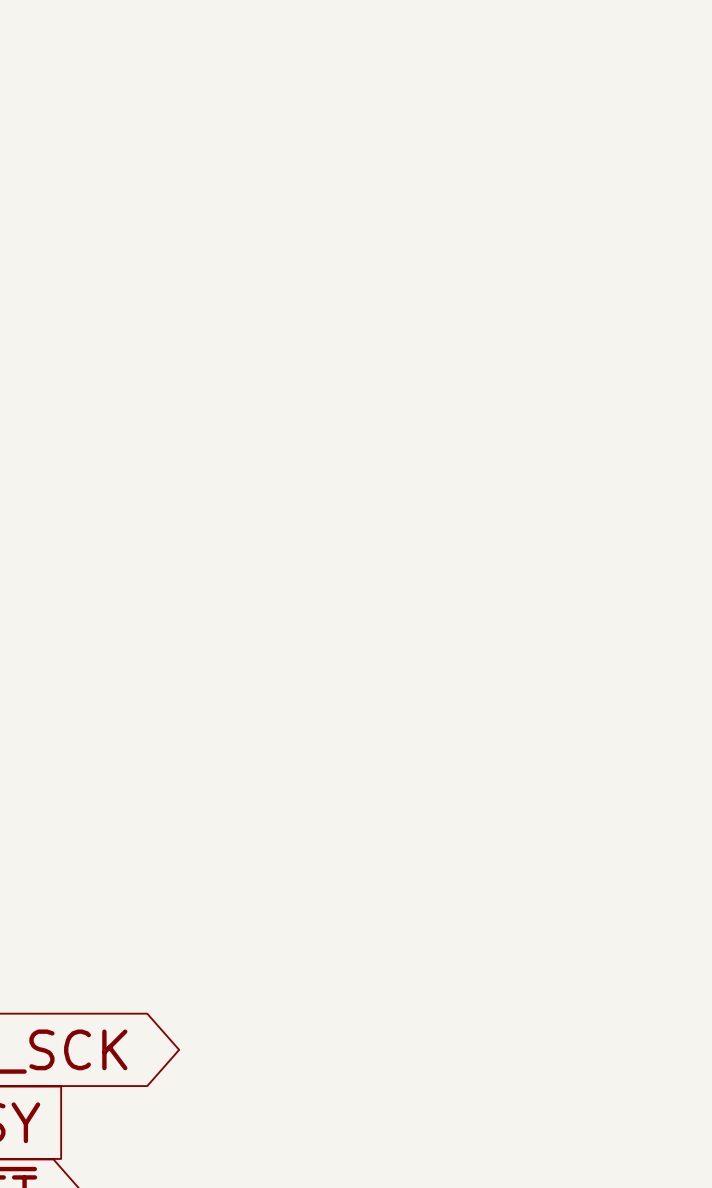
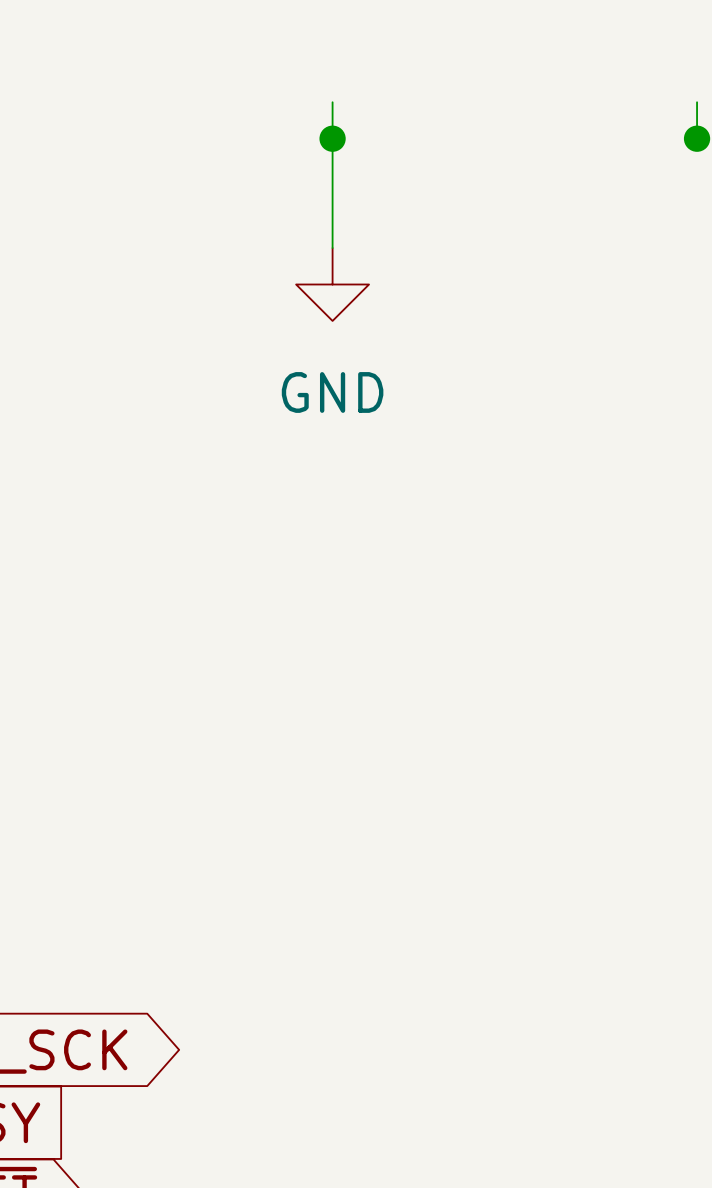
wire: none -> (332, 102) (332, 248)
wire: none -> (697, 102) (697, 138)
junction: none -> (332, 138)
junction: none -> (697, 138)
power symbol: none -> GND (332, 284)

